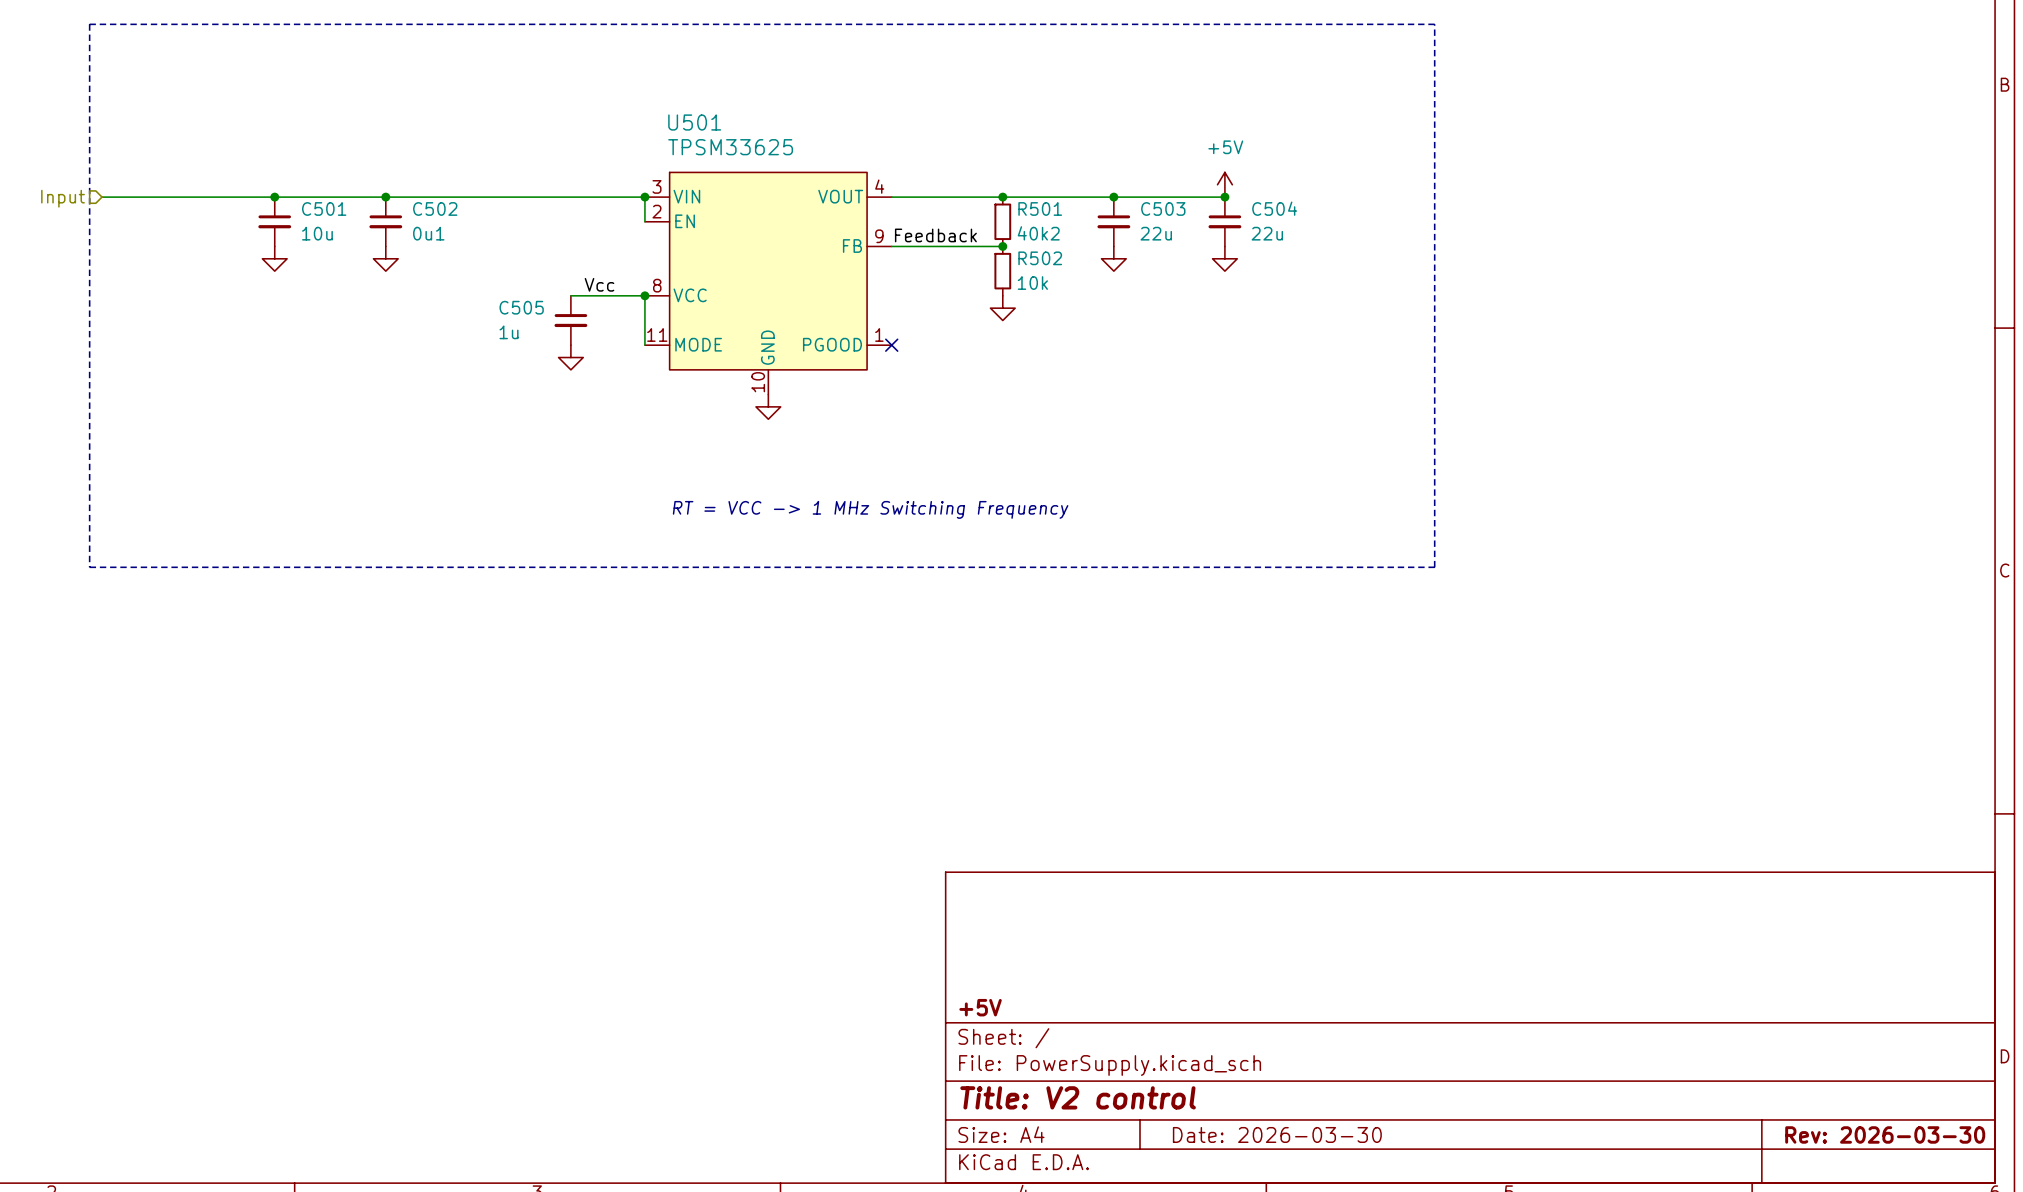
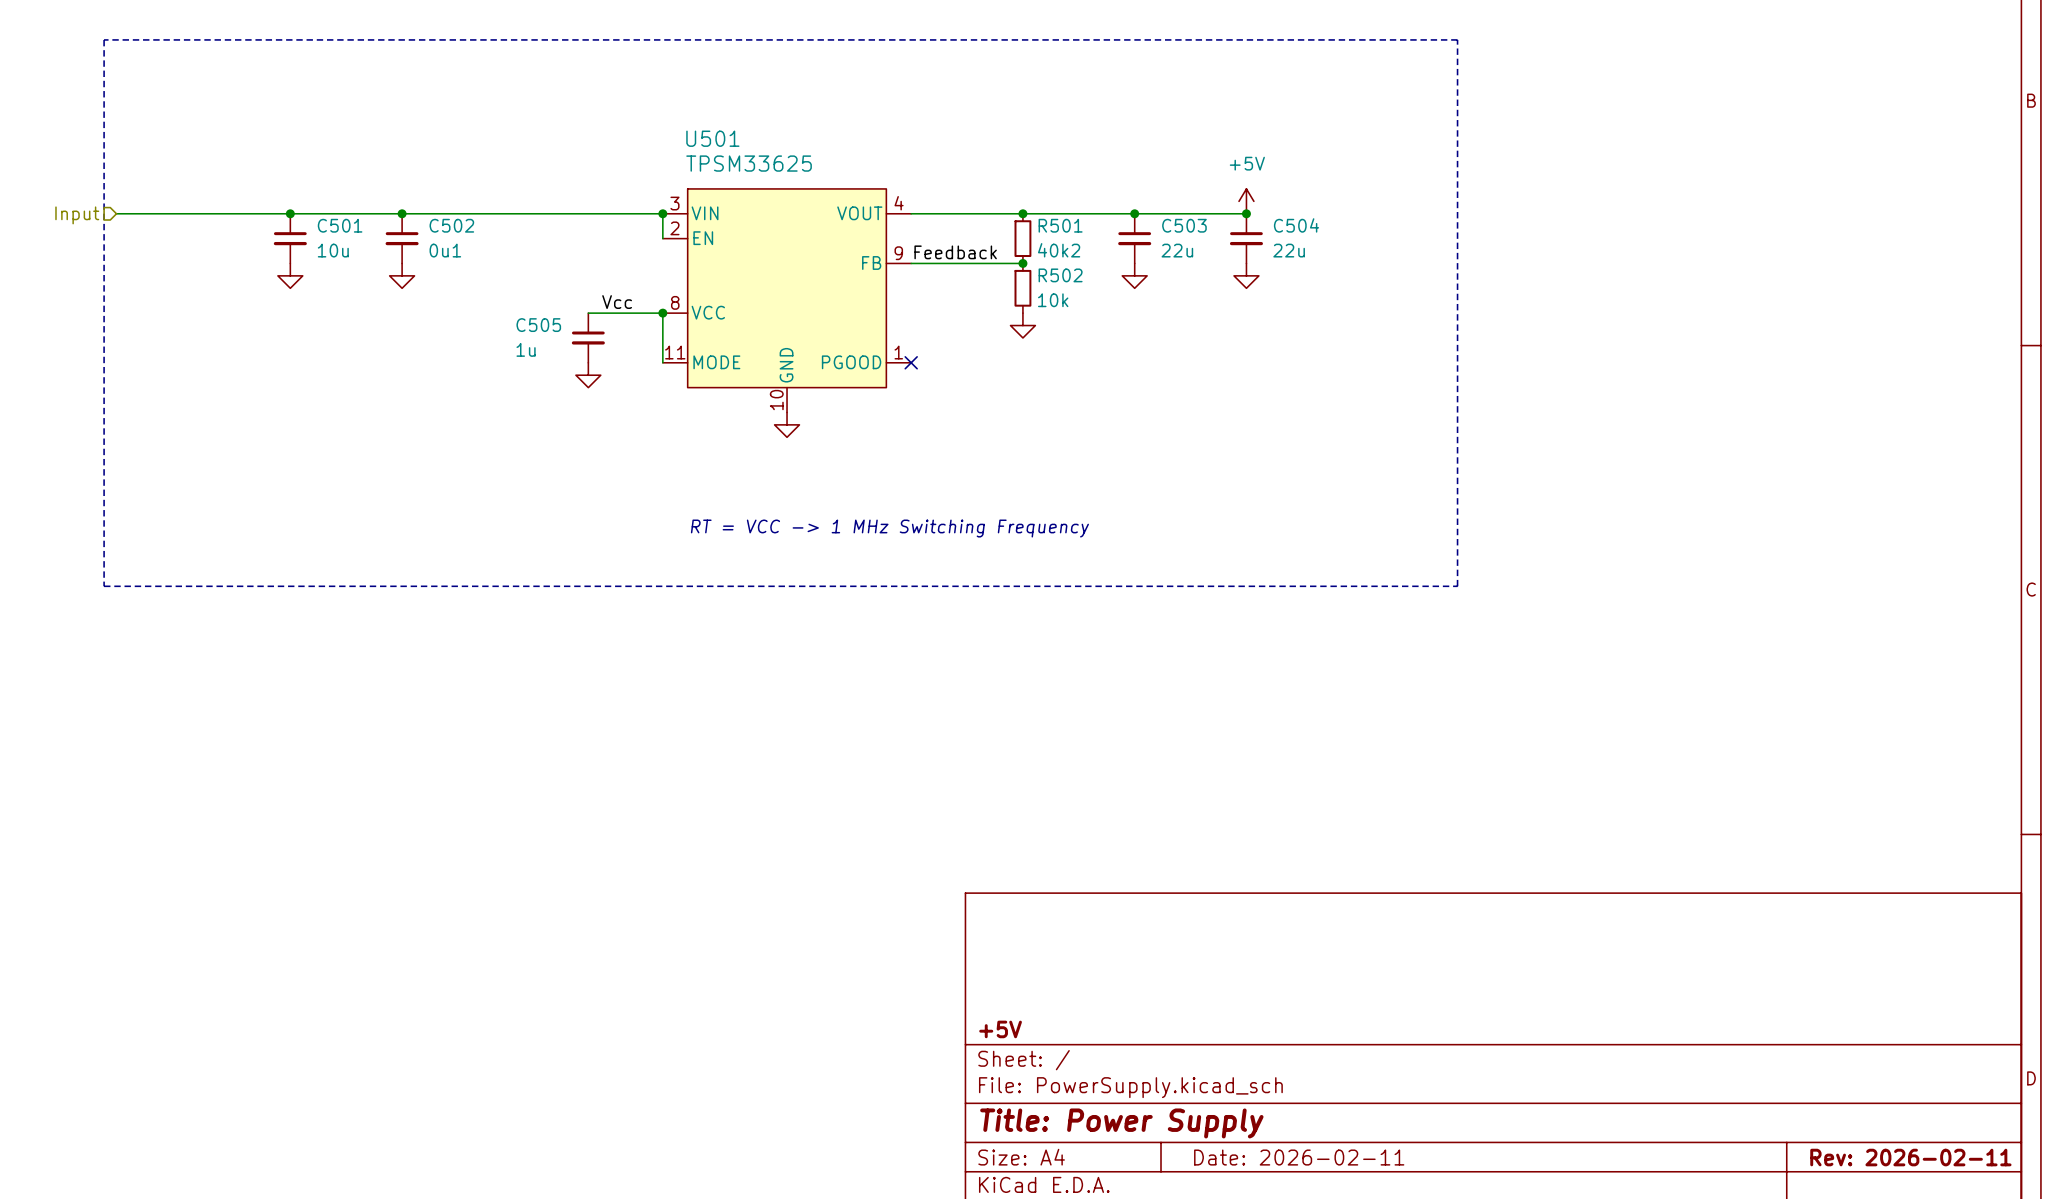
title block: Title: V2 control (1078, 1097) -> Title: Power Supply (1121, 1123)
title block: Date: 2026-03-30 (1277, 1134) -> Date: 2026-02-11 (1299, 1157)
title block: Rev: 2026-03-30 (1885, 1134) -> Rev: 2026-02-11 (1910, 1157)

